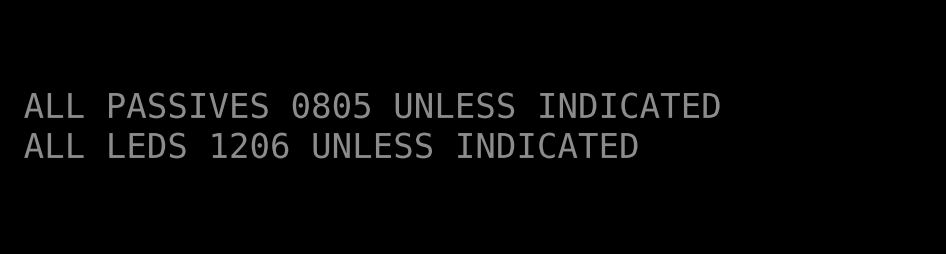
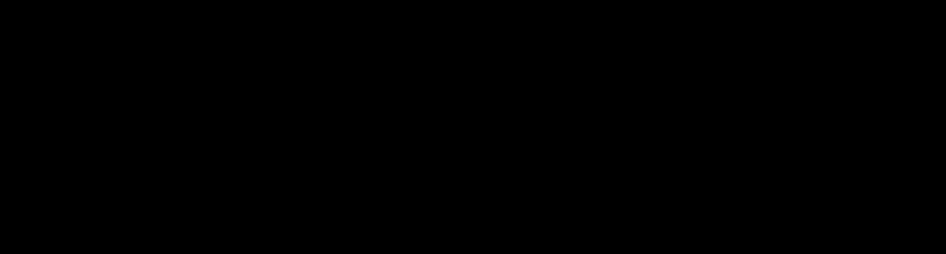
text: ALL PASSIVES 0805 UNLESS INDICATED (371, 105) -> none
text: ALL LEDS 1206 UNLESS INDICATED (330, 145) -> none

